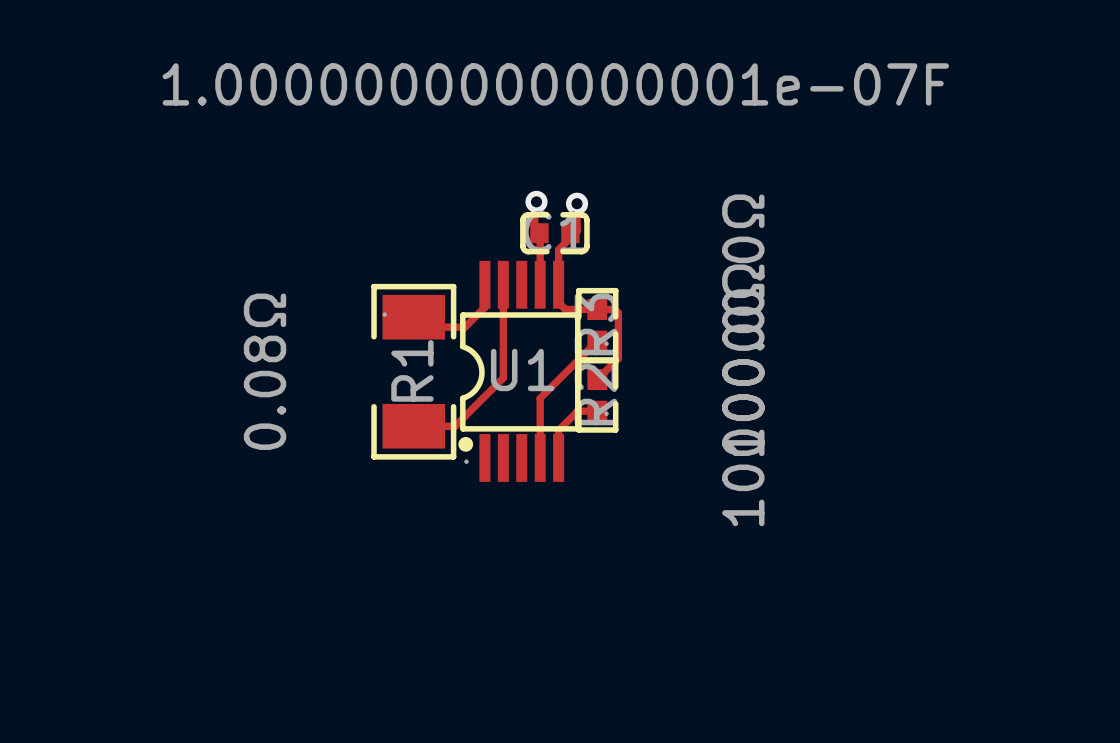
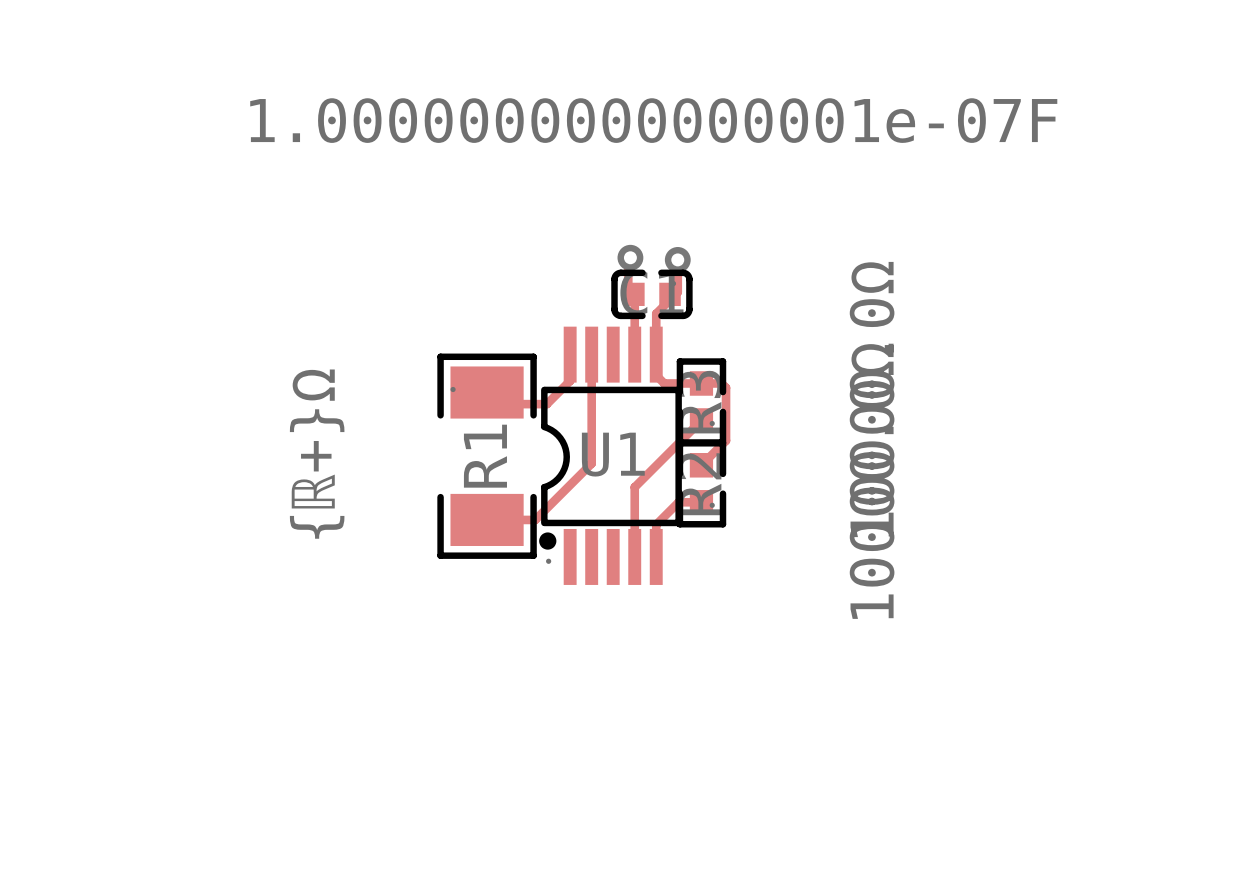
R1 value: 0.08Ω (265, 371) -> {ℝ+}Ω (317, 454)

